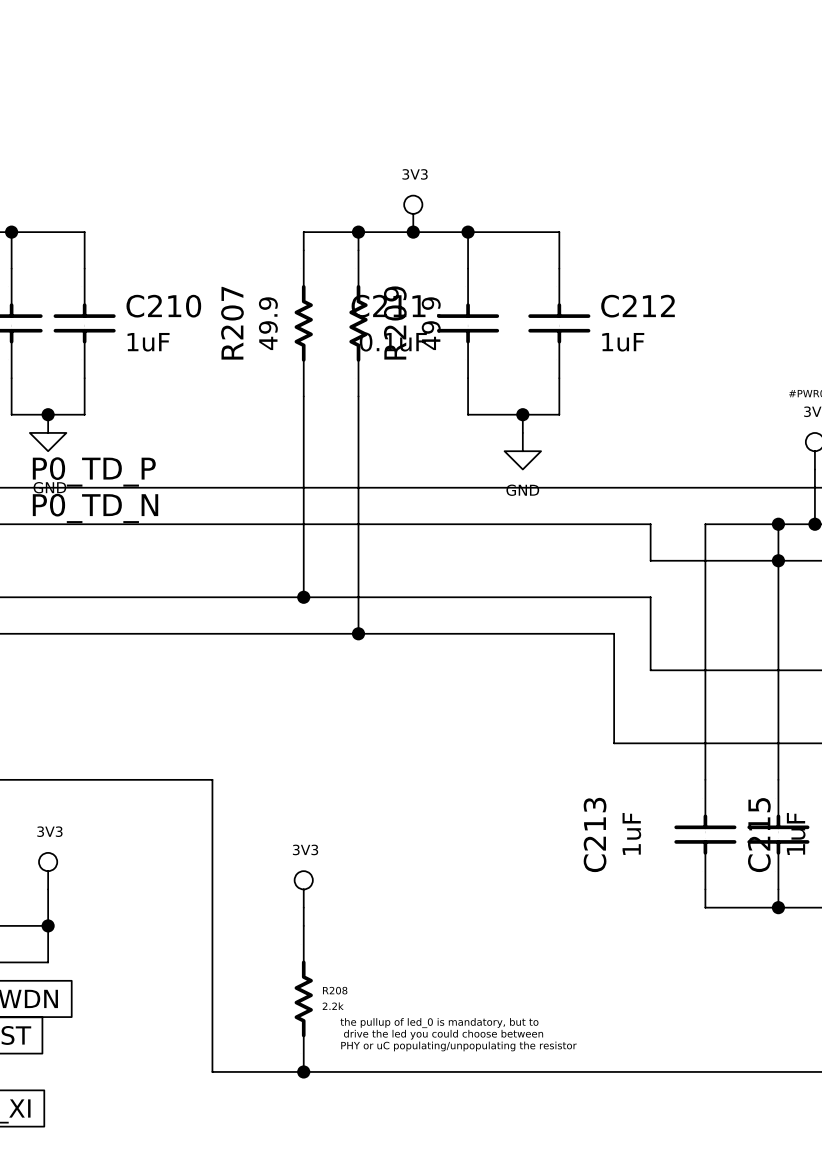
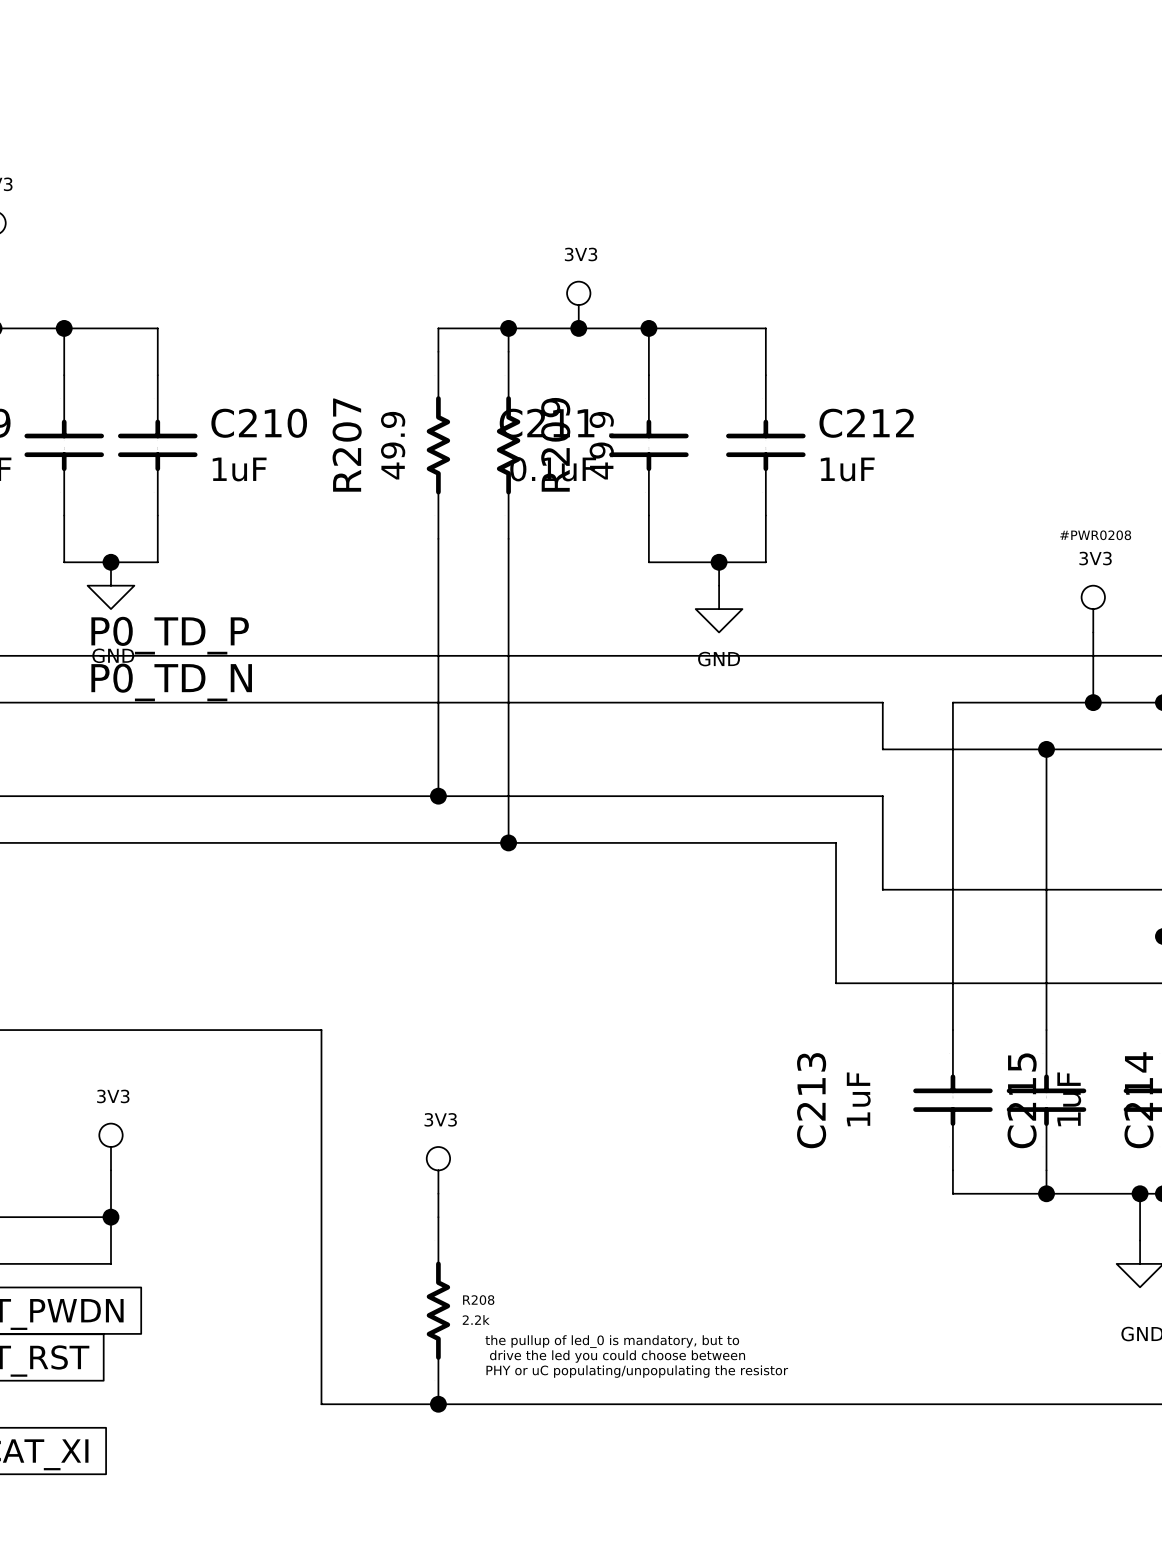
wire: (778, 524) (778, 560) -> none
junction: (778, 524) -> none

